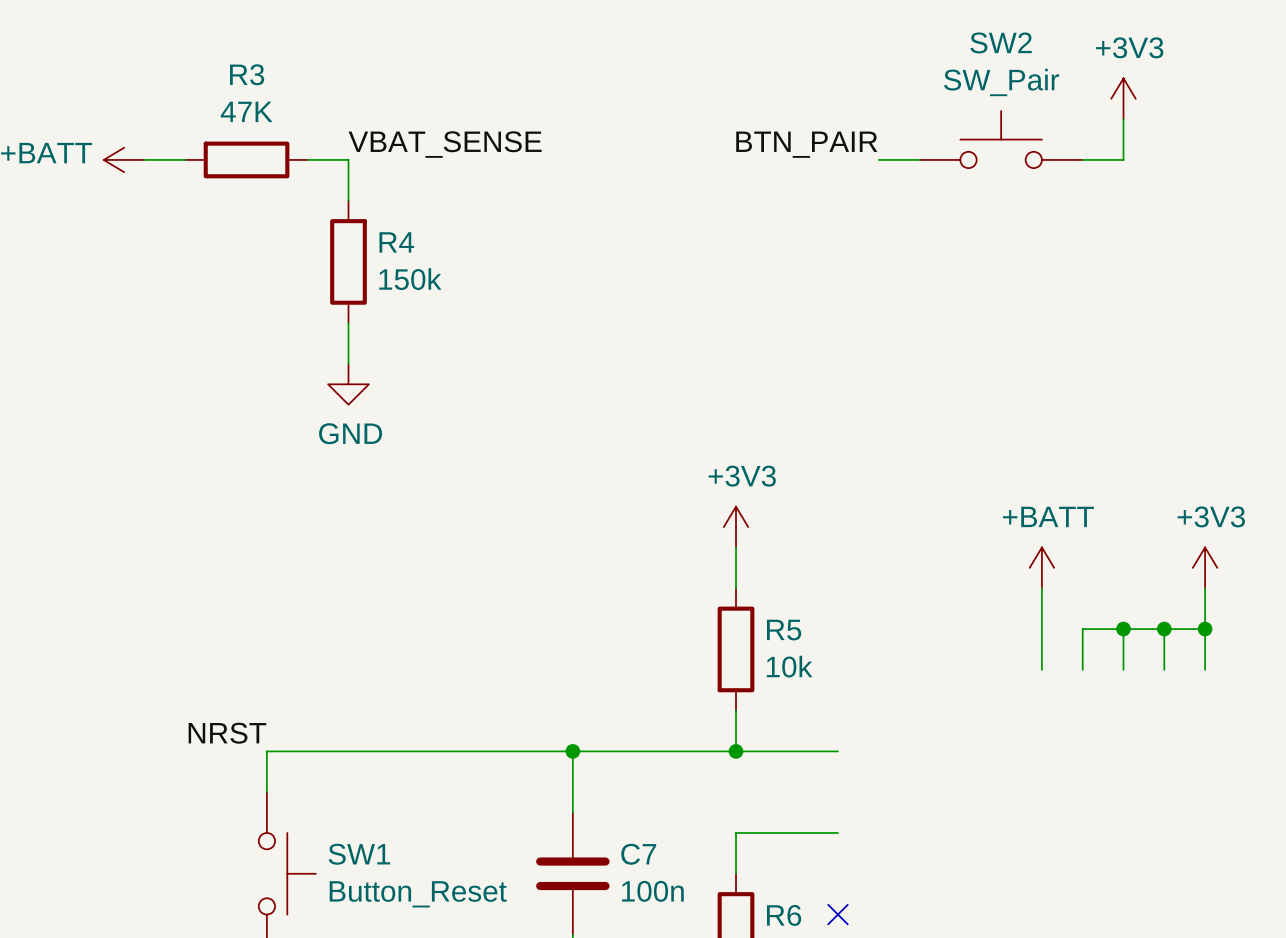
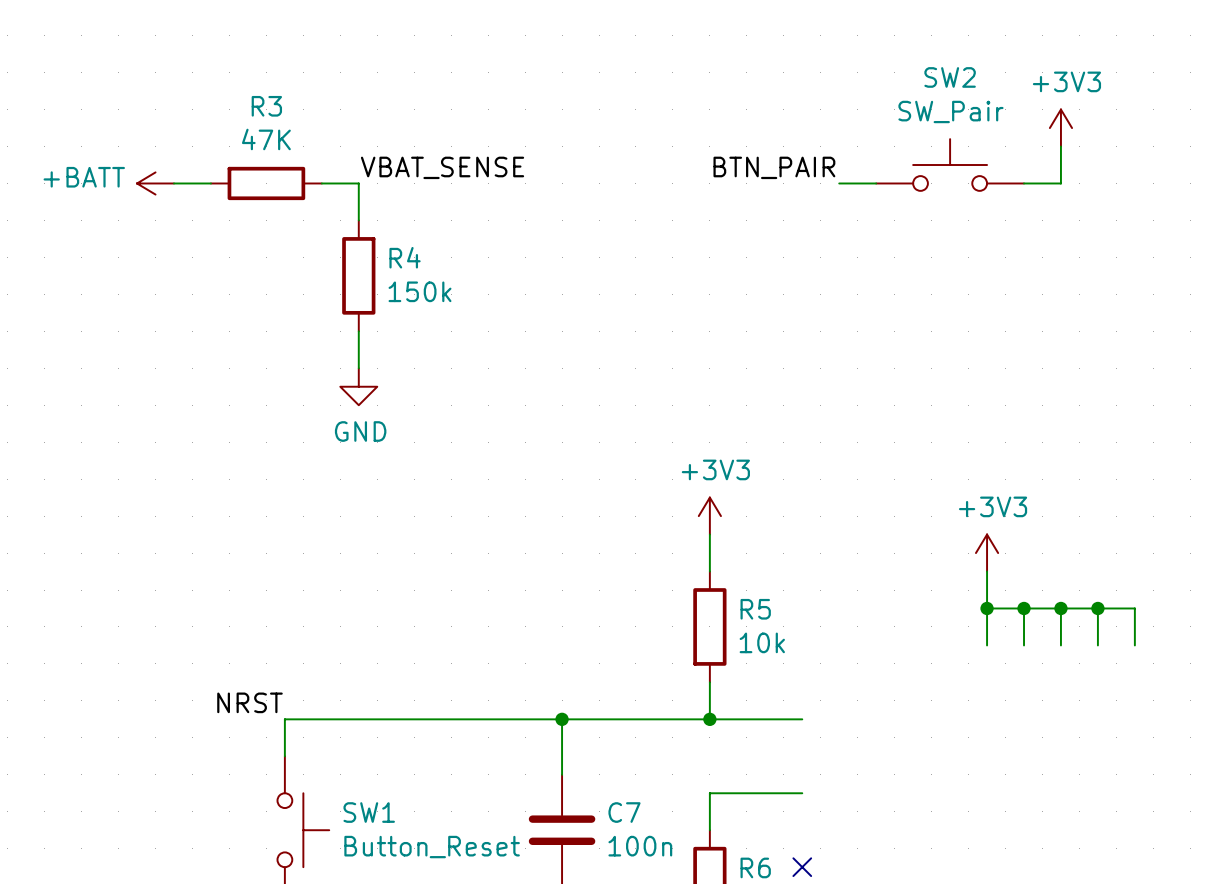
power symbol: +BATT (1041, 567) -> +3V3 (987, 553)
power symbol: +3V3 (1205, 567) -> none
wire: (1205, 588) (1205, 629) -> none
wire: none -> (987, 608) (1024, 608)
junction: none -> (987, 608)
junction: none -> (1024, 608)
junction: (1205, 629) -> none

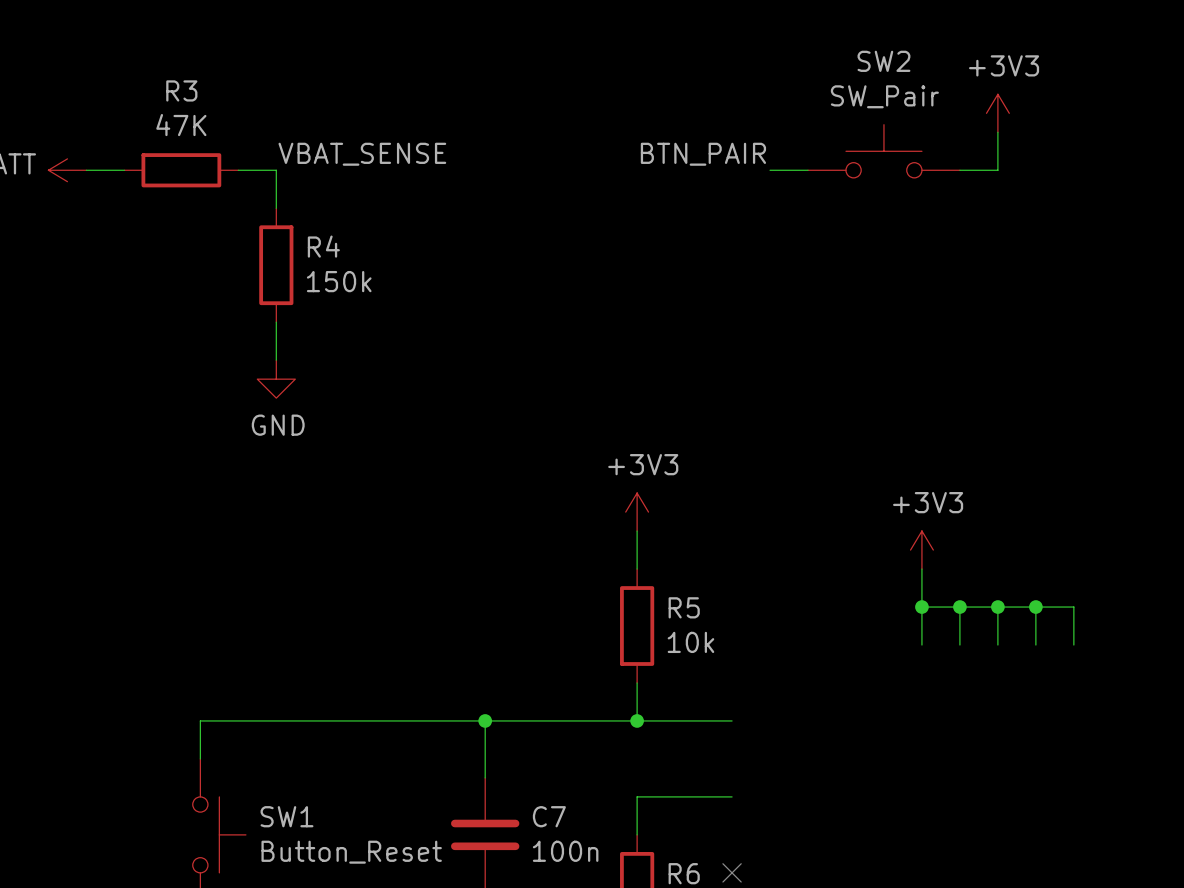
label: NRST (249, 702) -> none

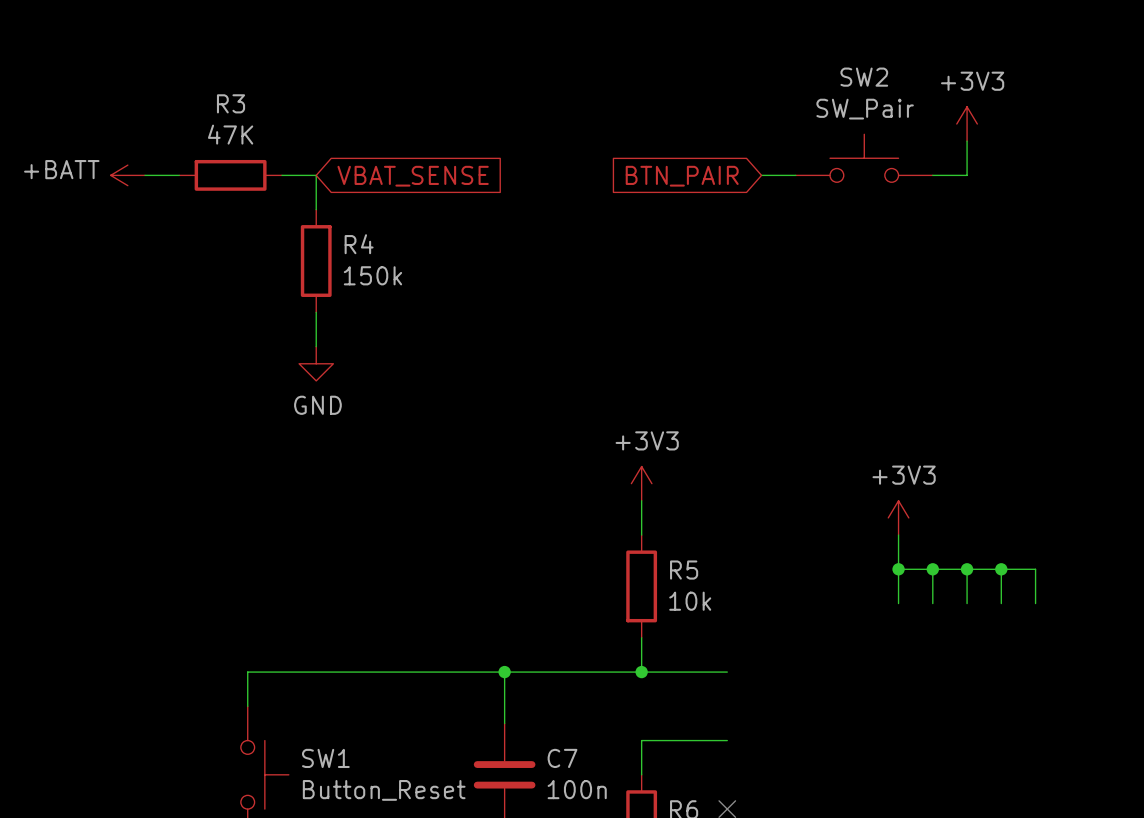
label: VBAT_SENSE (362, 154) -> none
label: BTN_PAIR (703, 154) -> none
global label: none -> VBAT_SENSE (413, 176)
global label: none -> BTN_PAIR (682, 176)

